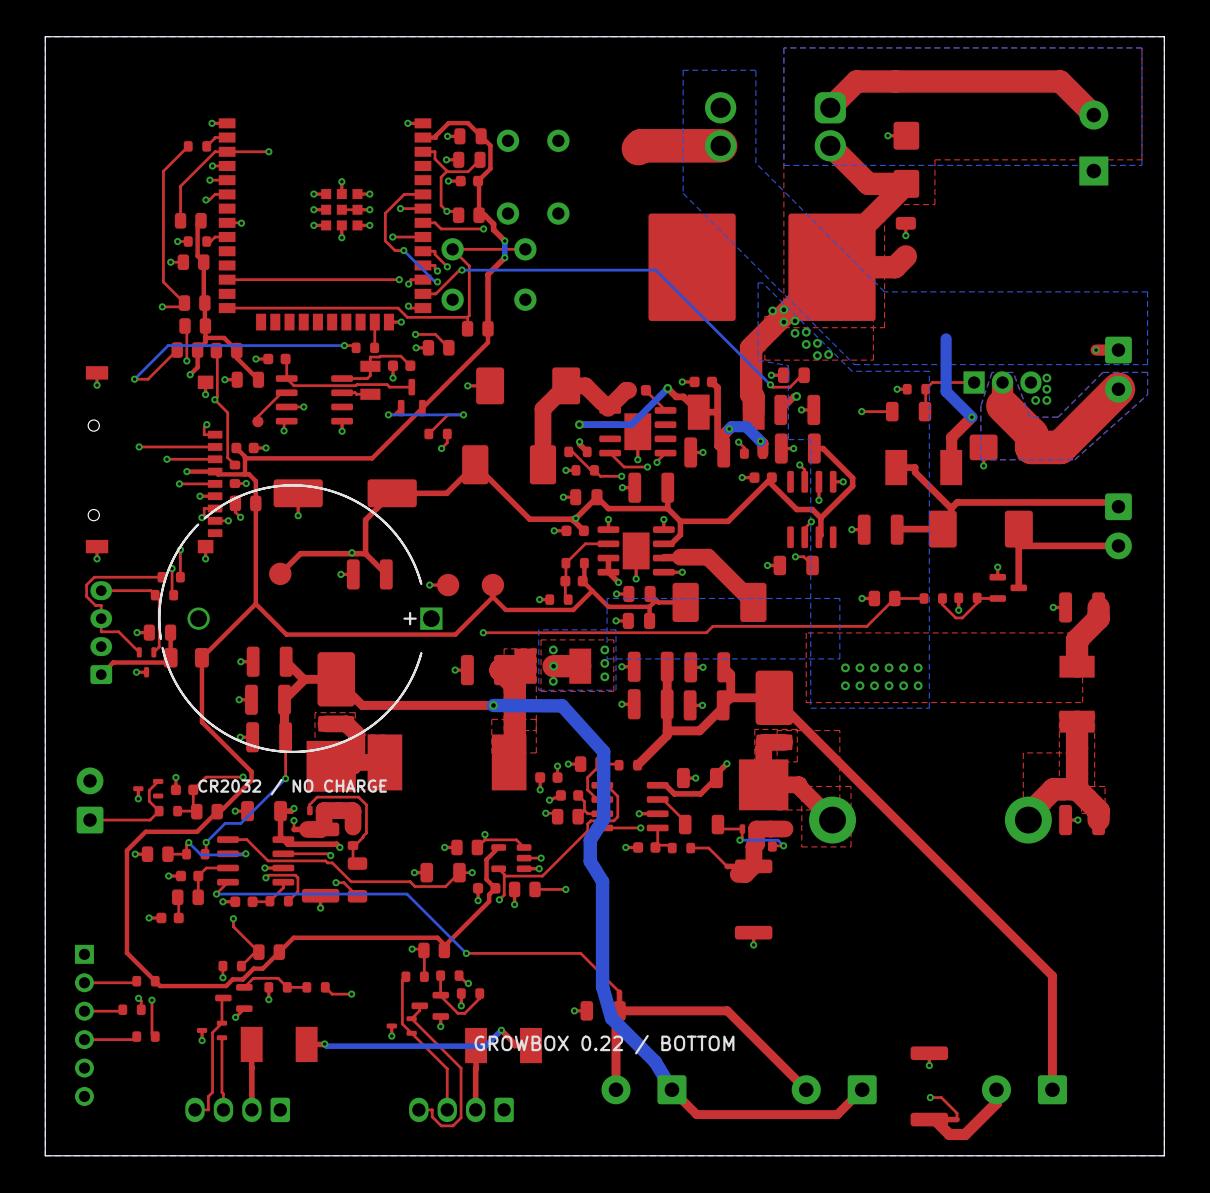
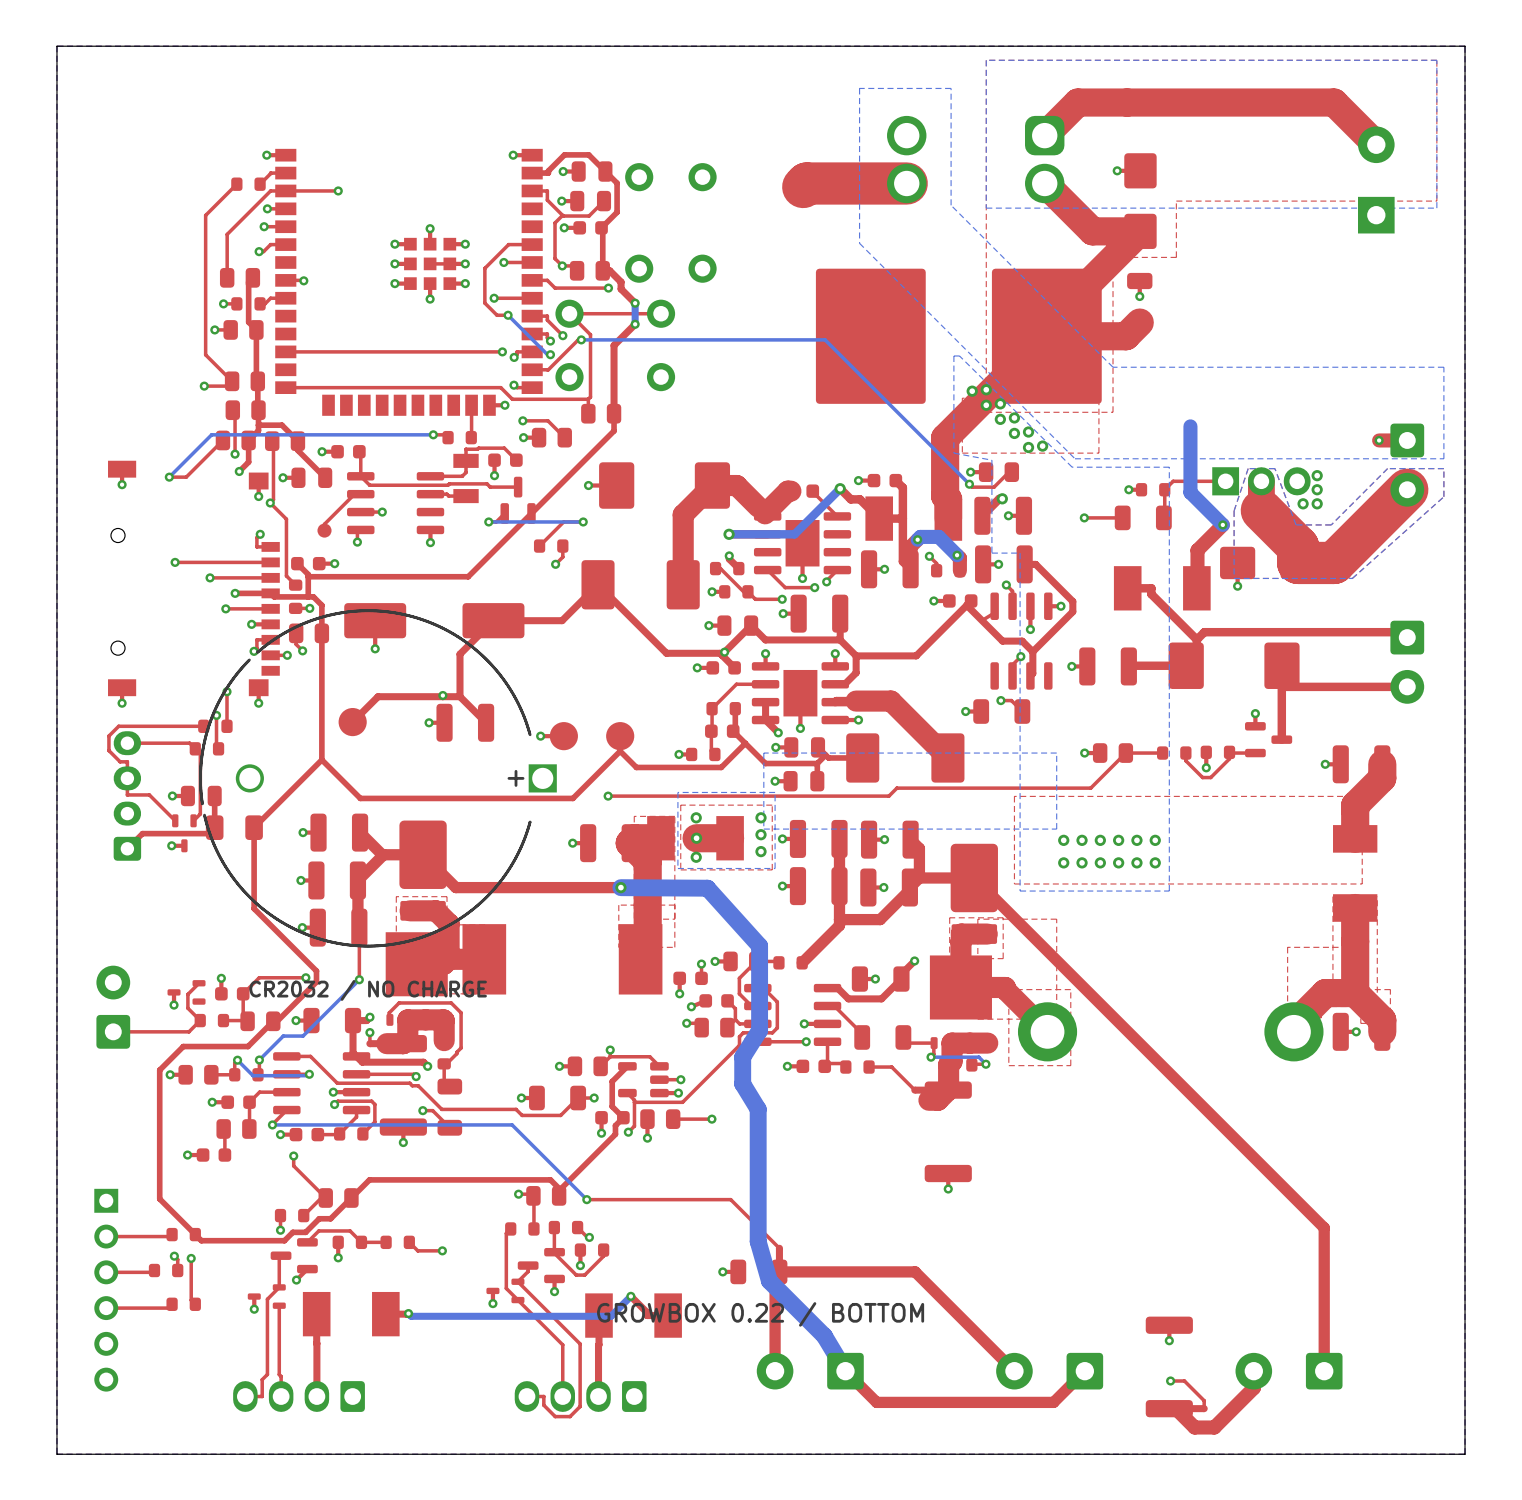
top track: none -> (993, 613) (982, 620)

